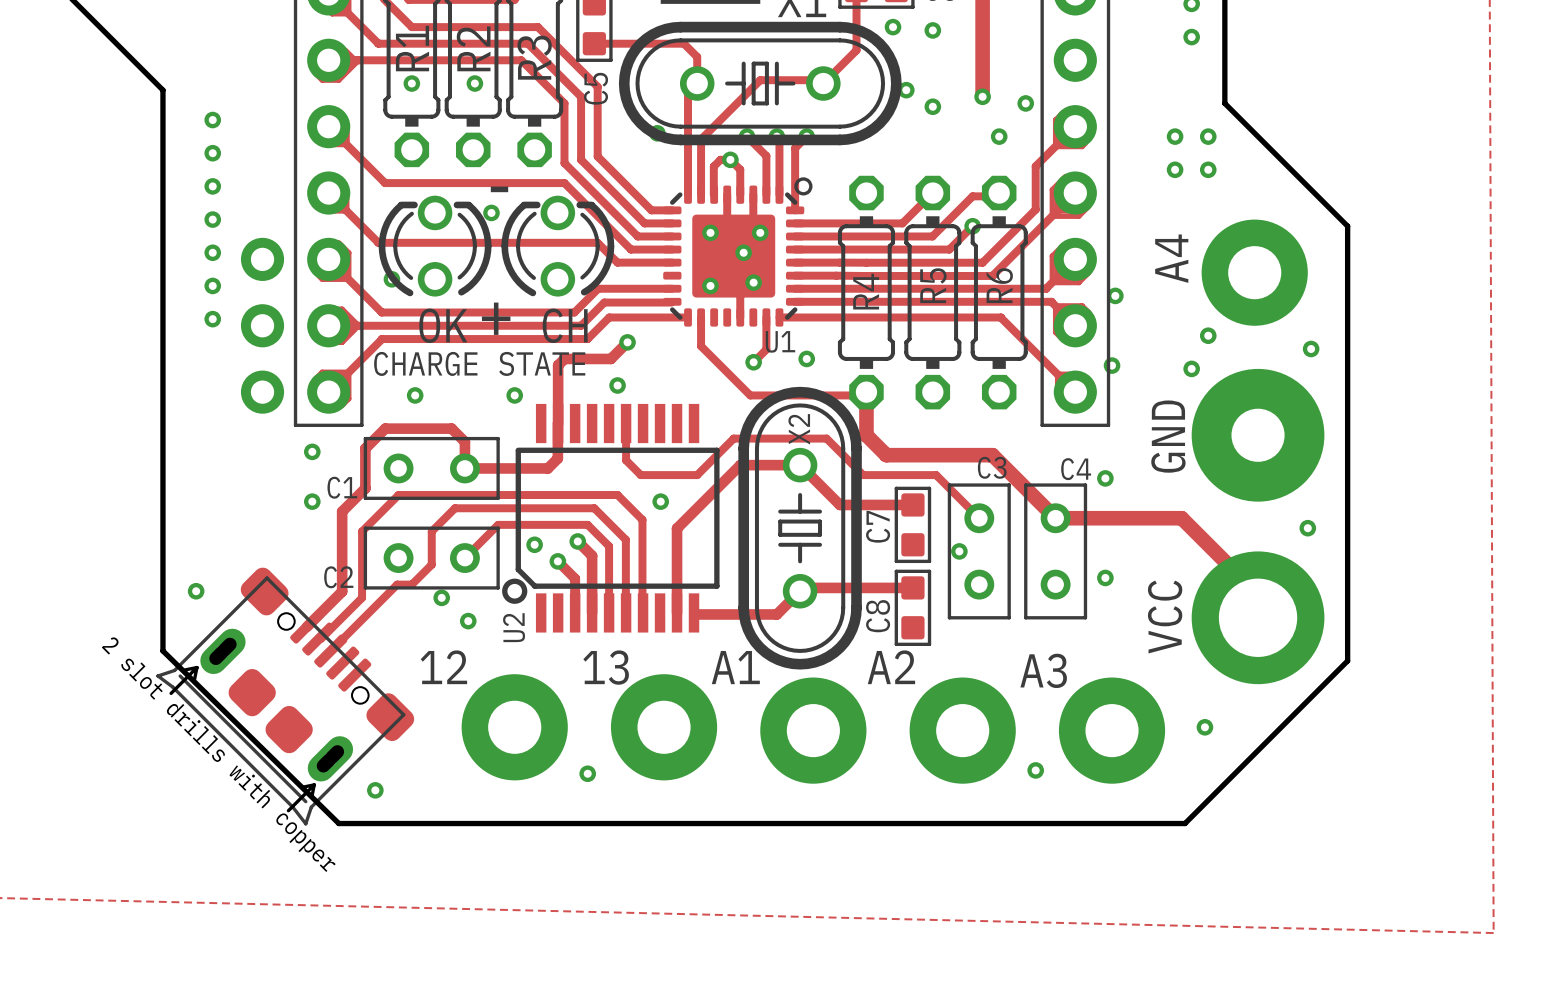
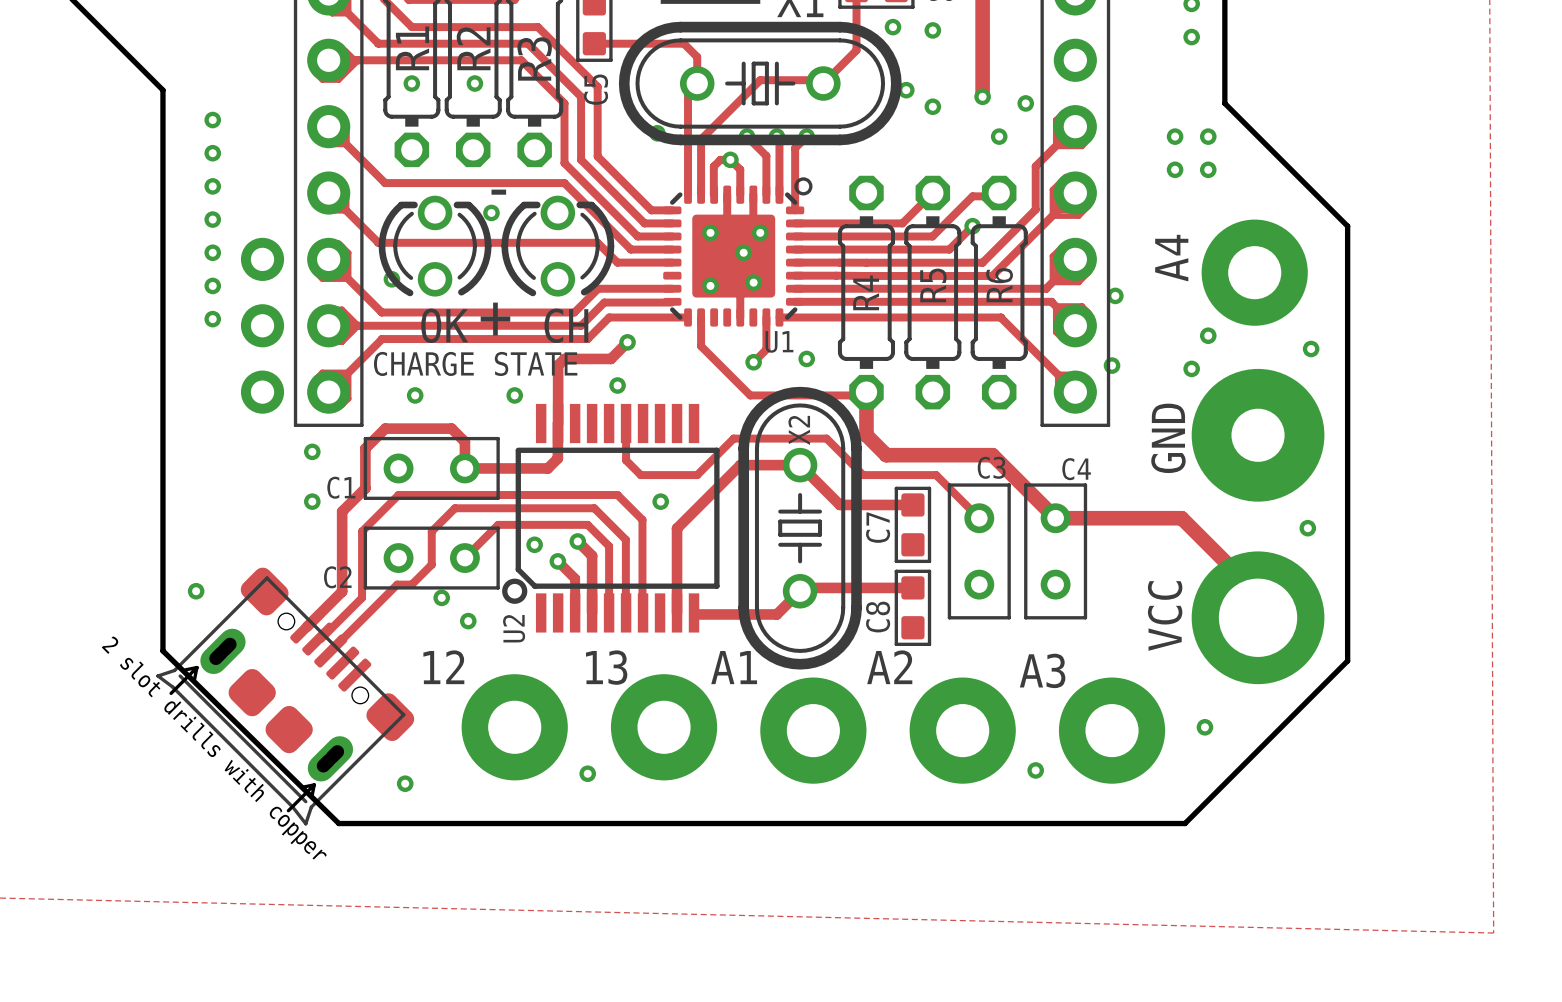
via: (1105, 478) -> none
via: (959, 551) -> none
via: (1105, 577) -> none
via position: (375, 790) -> (405, 783)

